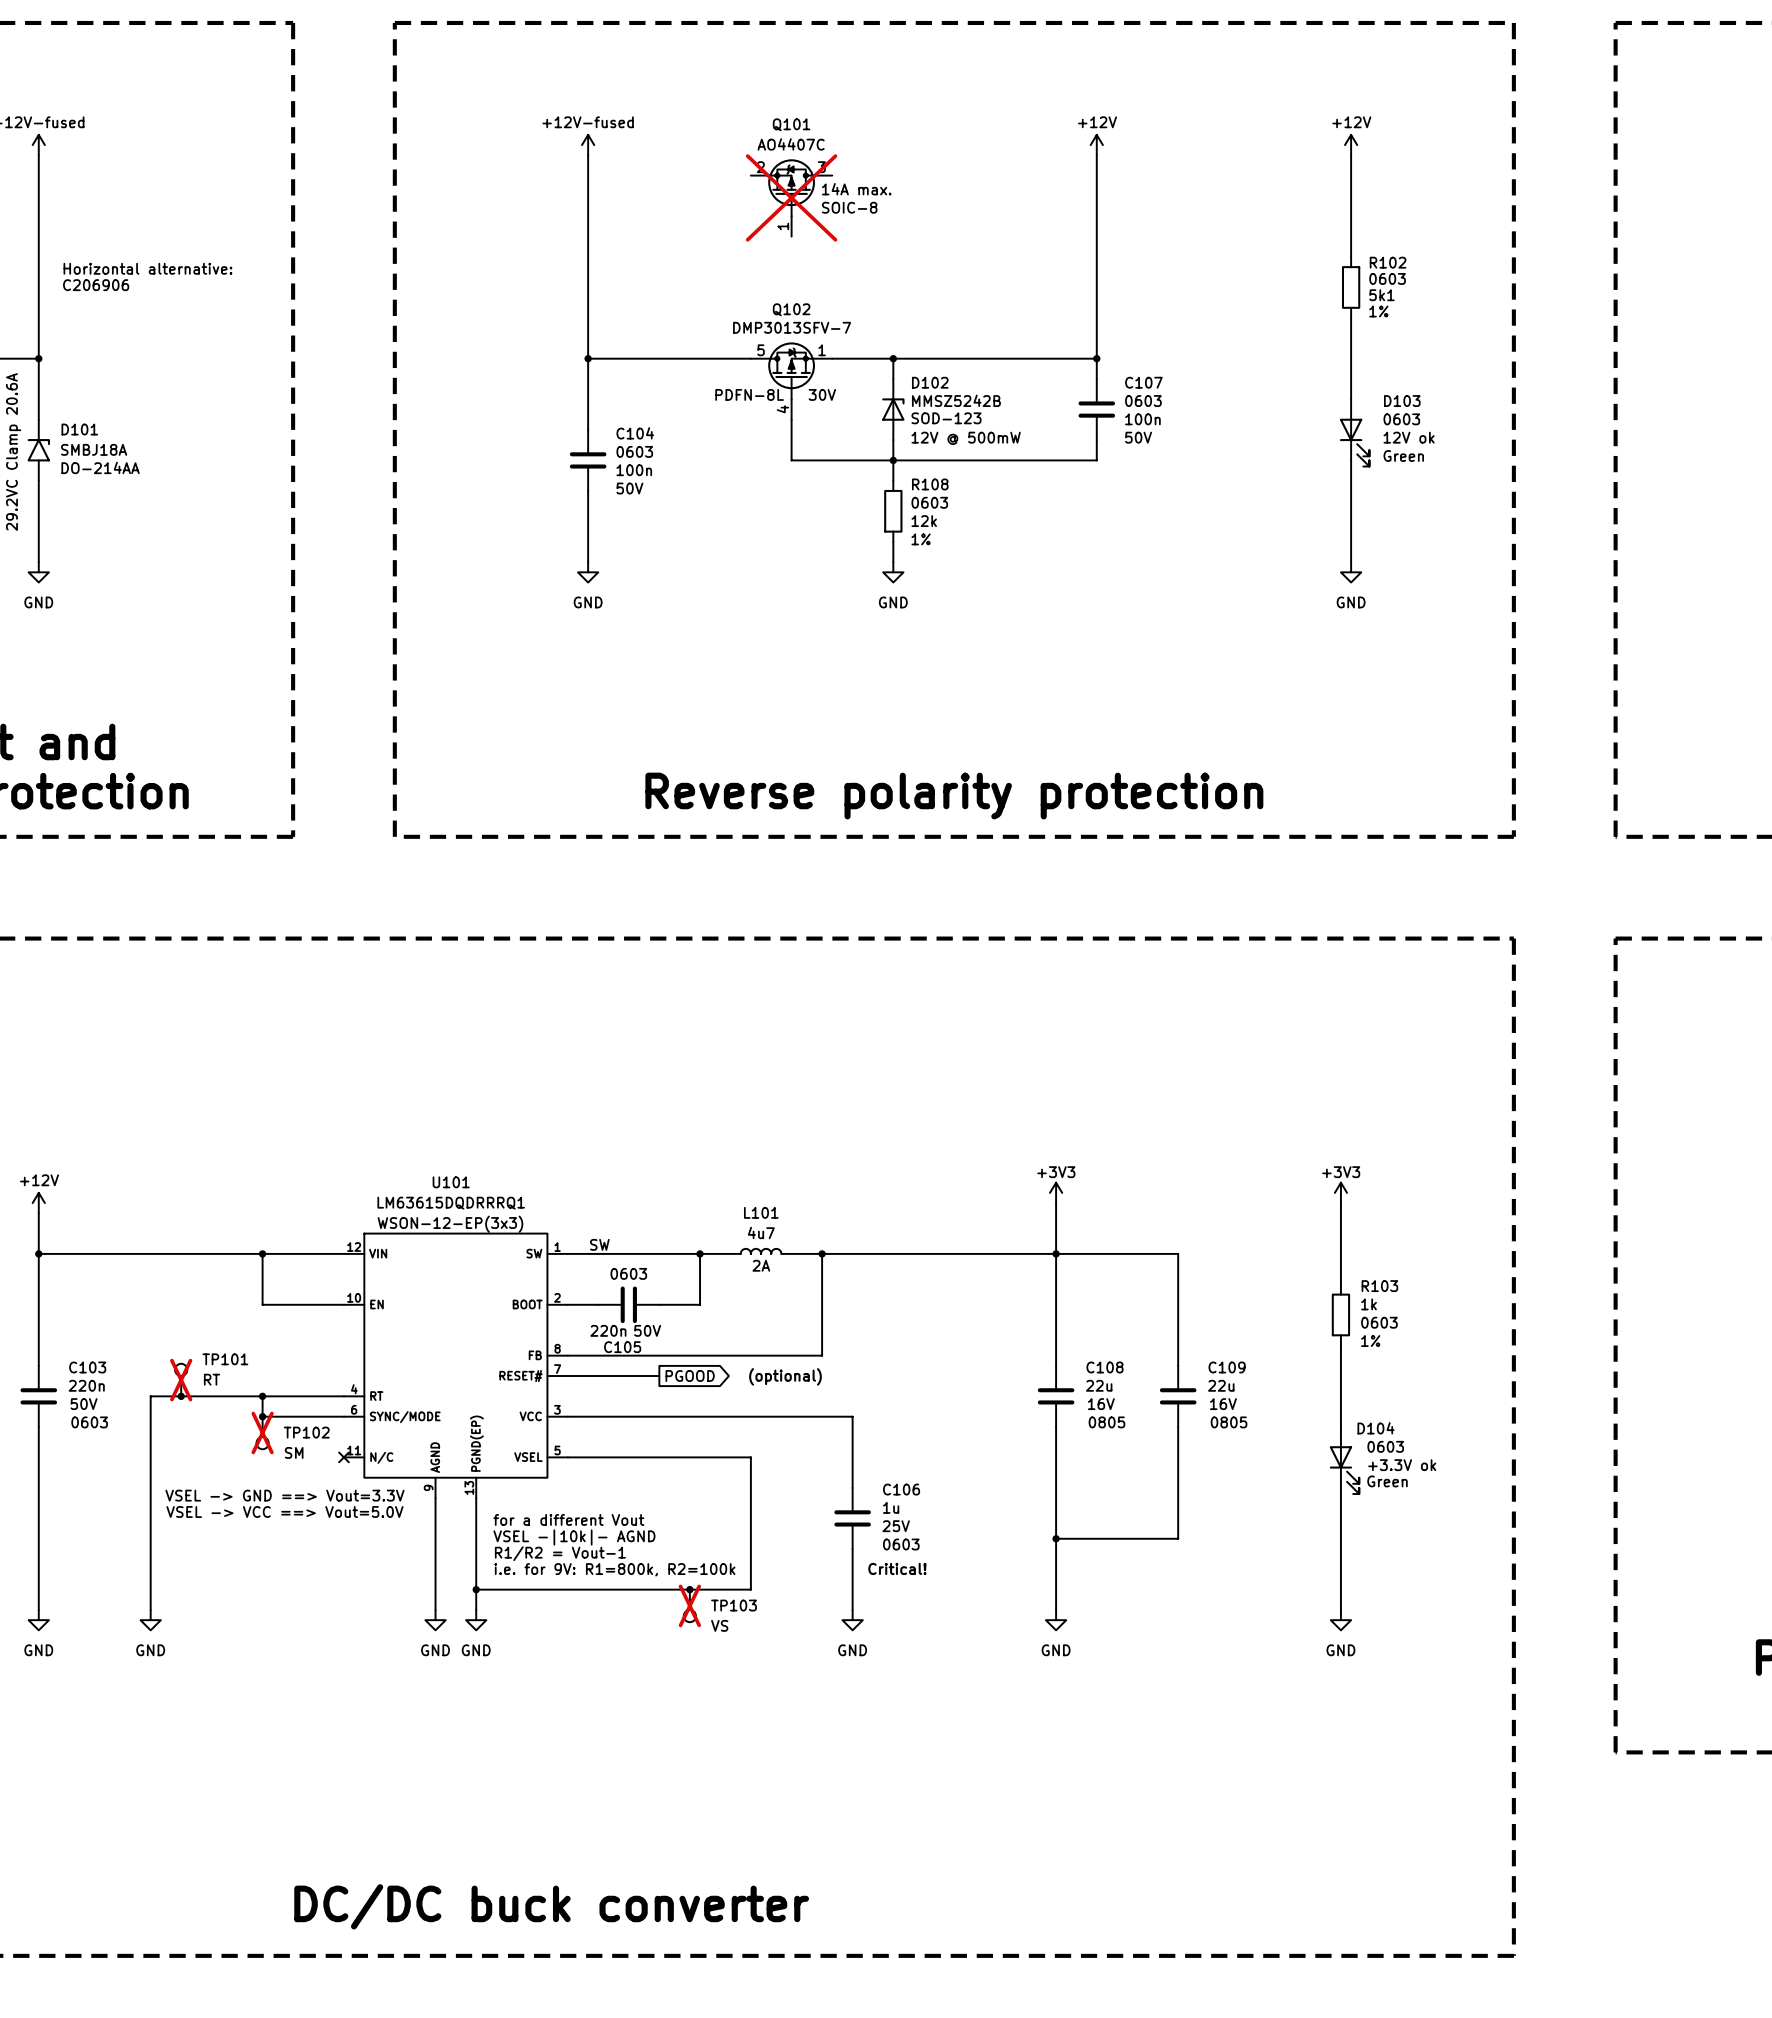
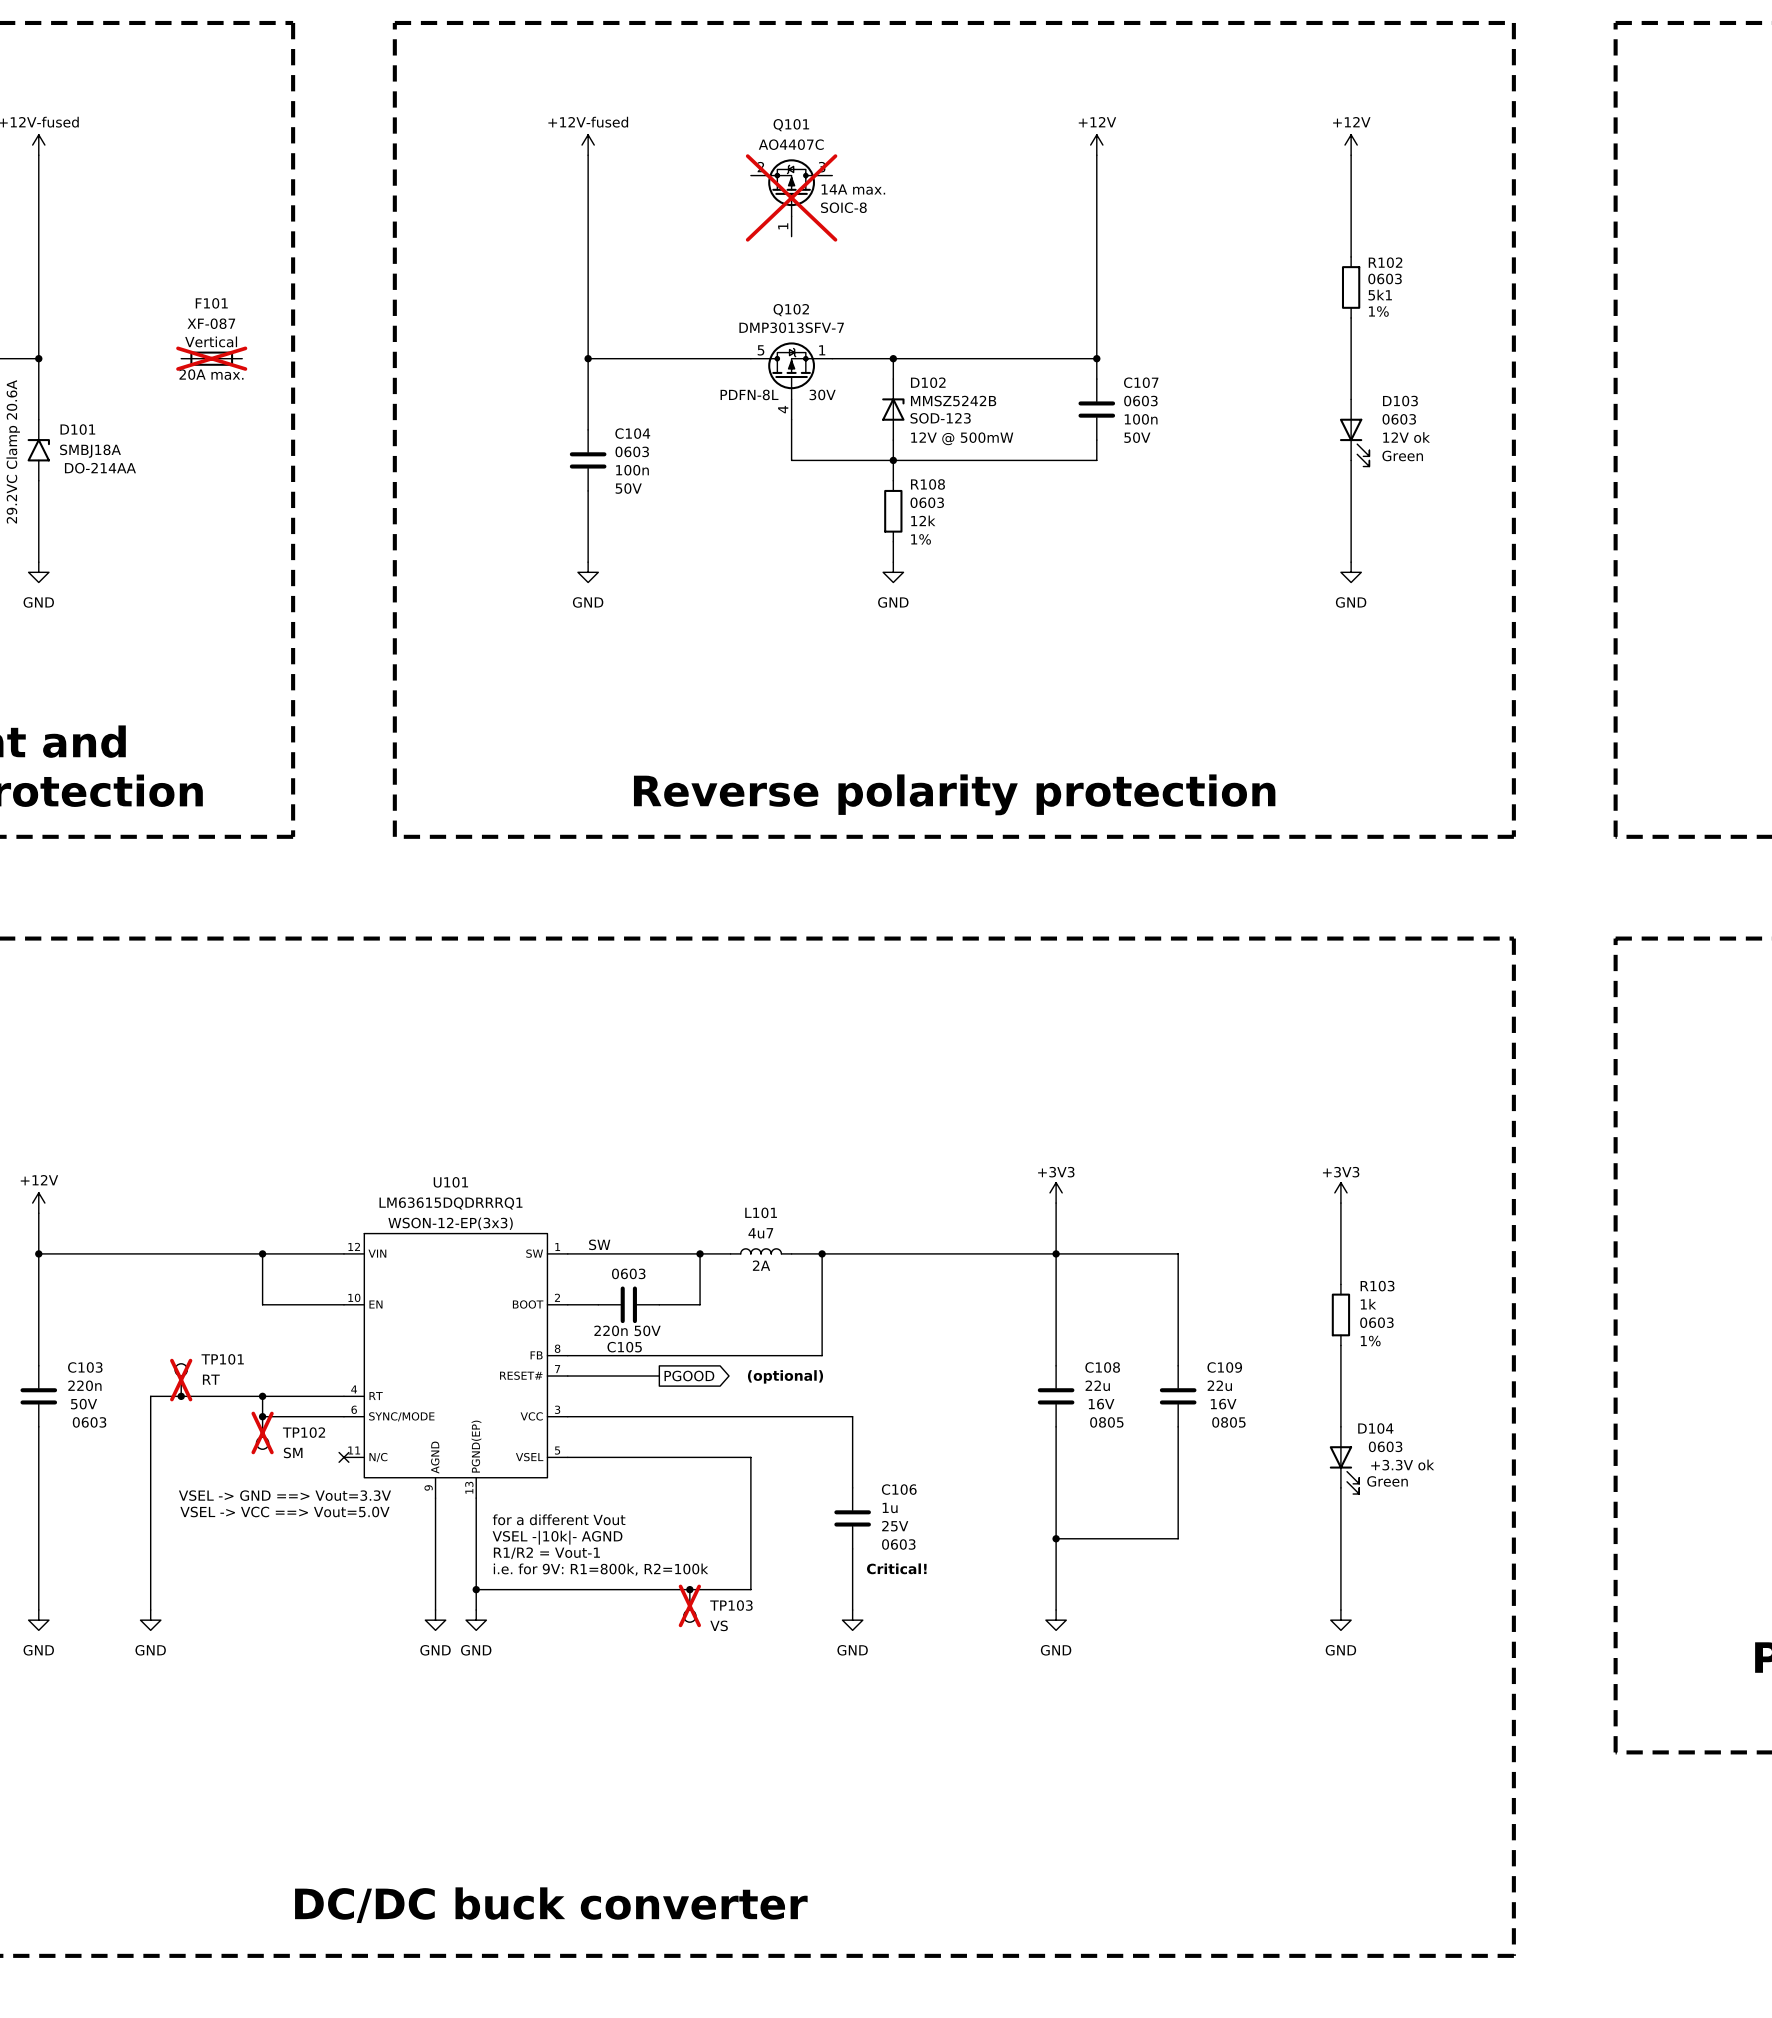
text: Horizontal alternative: (147, 268) -> none
text: C206906 (96, 285) -> none
F101: none -> XF-087 (211, 358)

